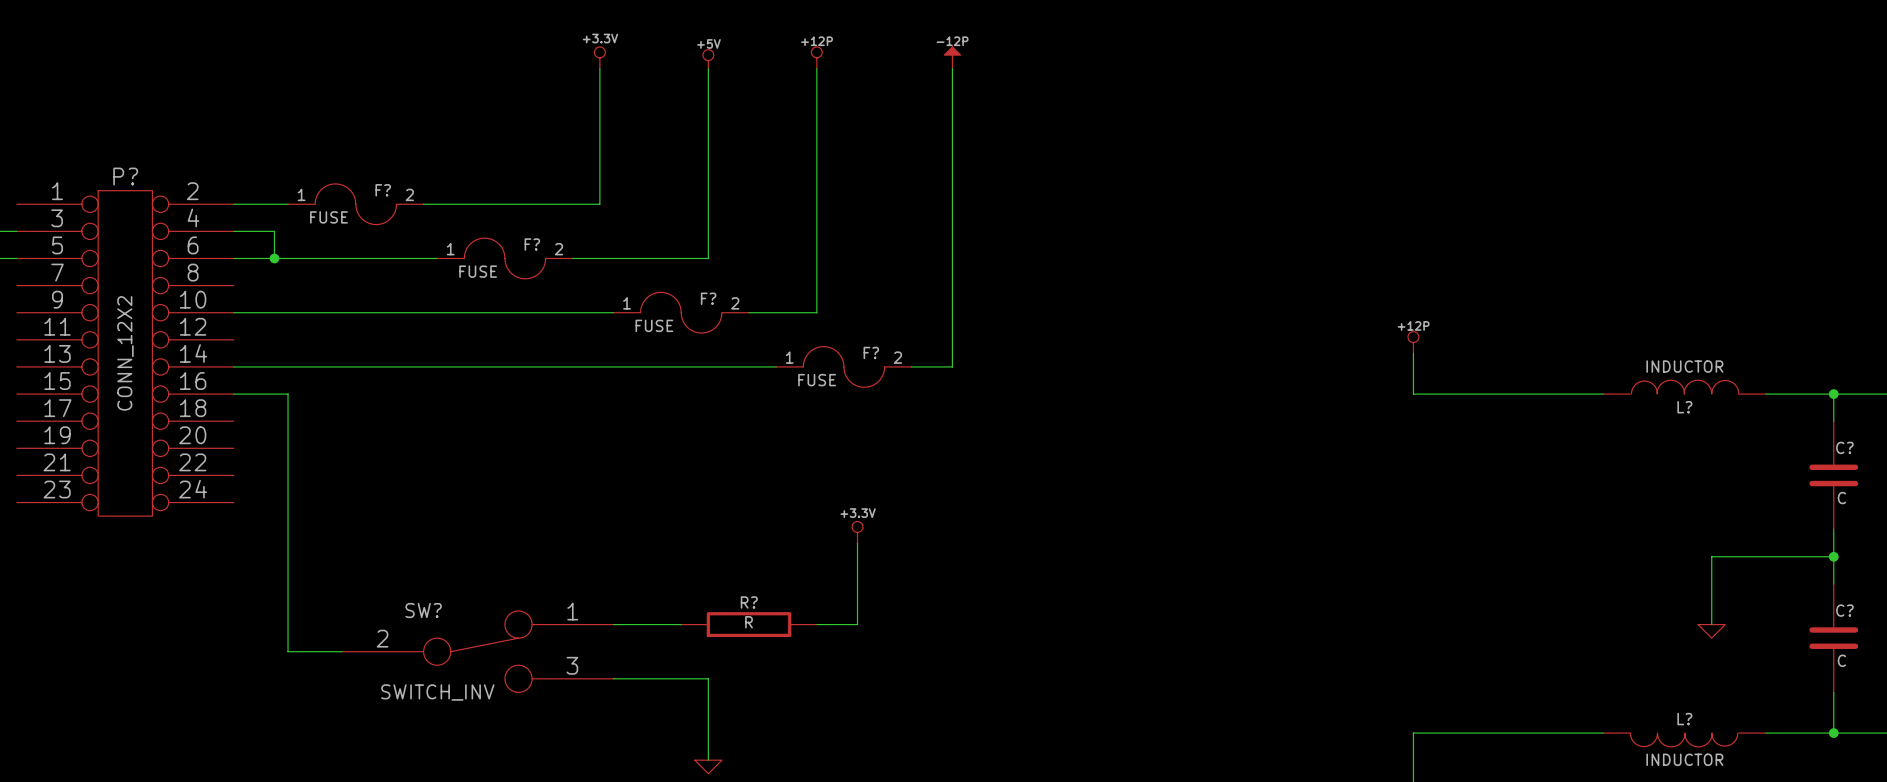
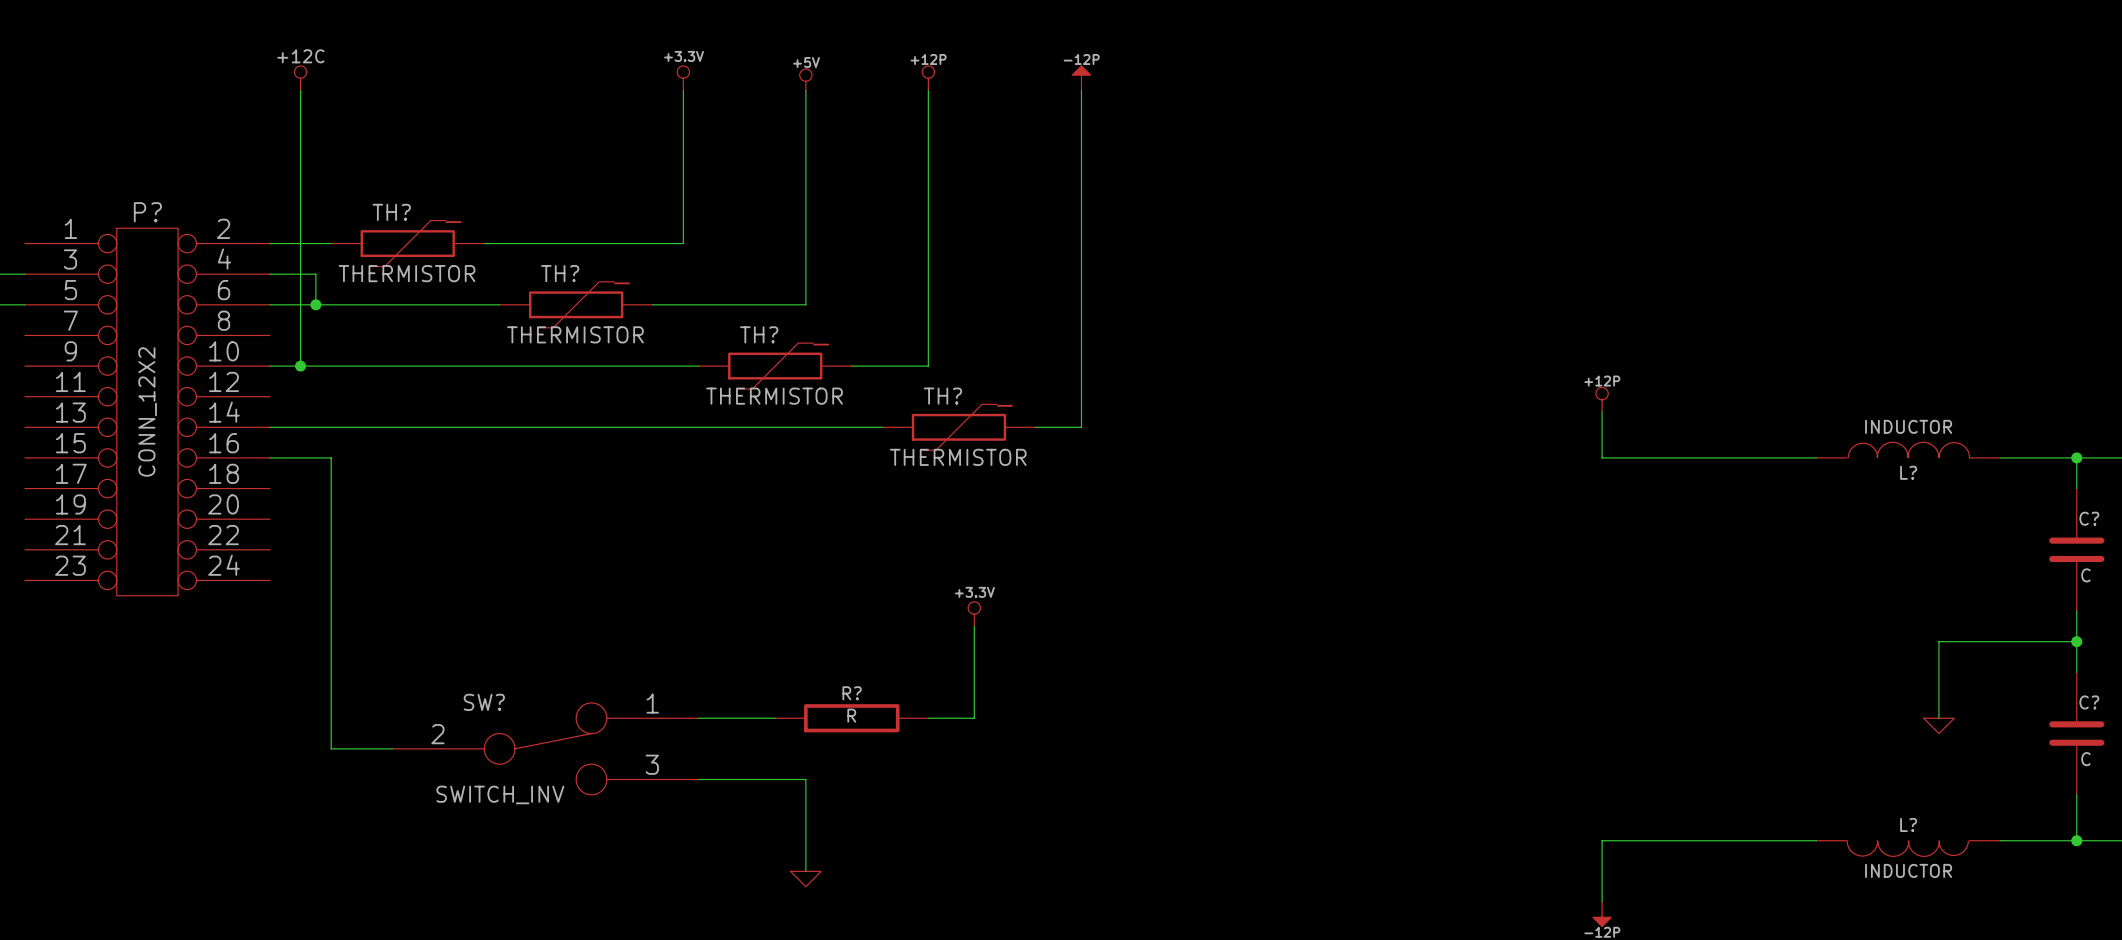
power symbol: none -> +12C (300, 78)
wire: none -> (300, 90) (300, 366)
F?: FUSE (355, 204) -> none
TH?: none -> THERMISTOR (407, 243)
F?: FUSE (504, 258) -> none
TH?: none -> THERMISTOR (576, 304)
junction: none -> (300, 366)
F?: FUSE (681, 312) -> none
TH?: none -> THERMISTOR (775, 366)
F?: FUSE (843, 366) -> none
TH?: none -> THERMISTOR (958, 427)

